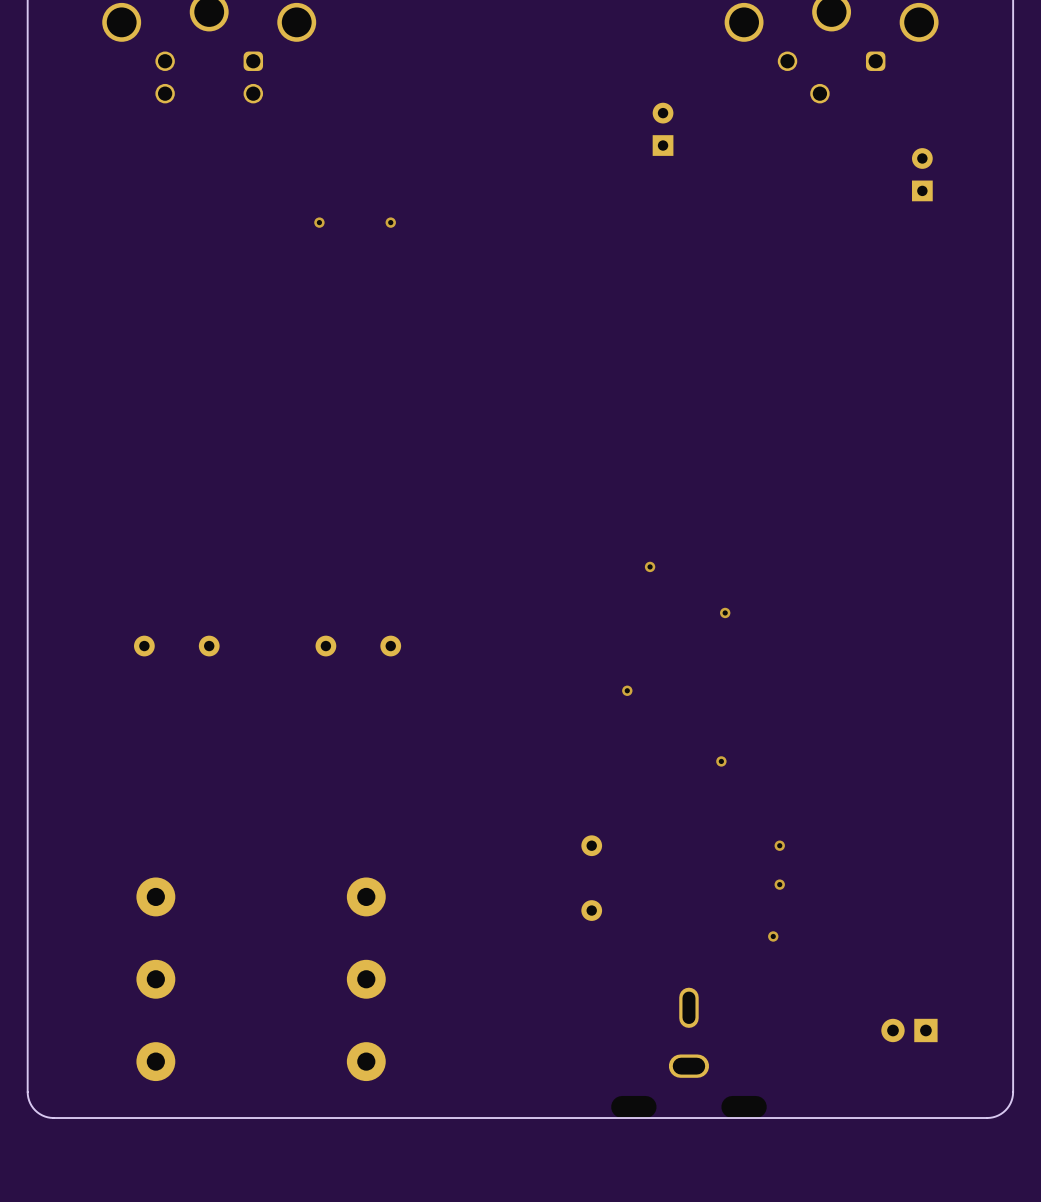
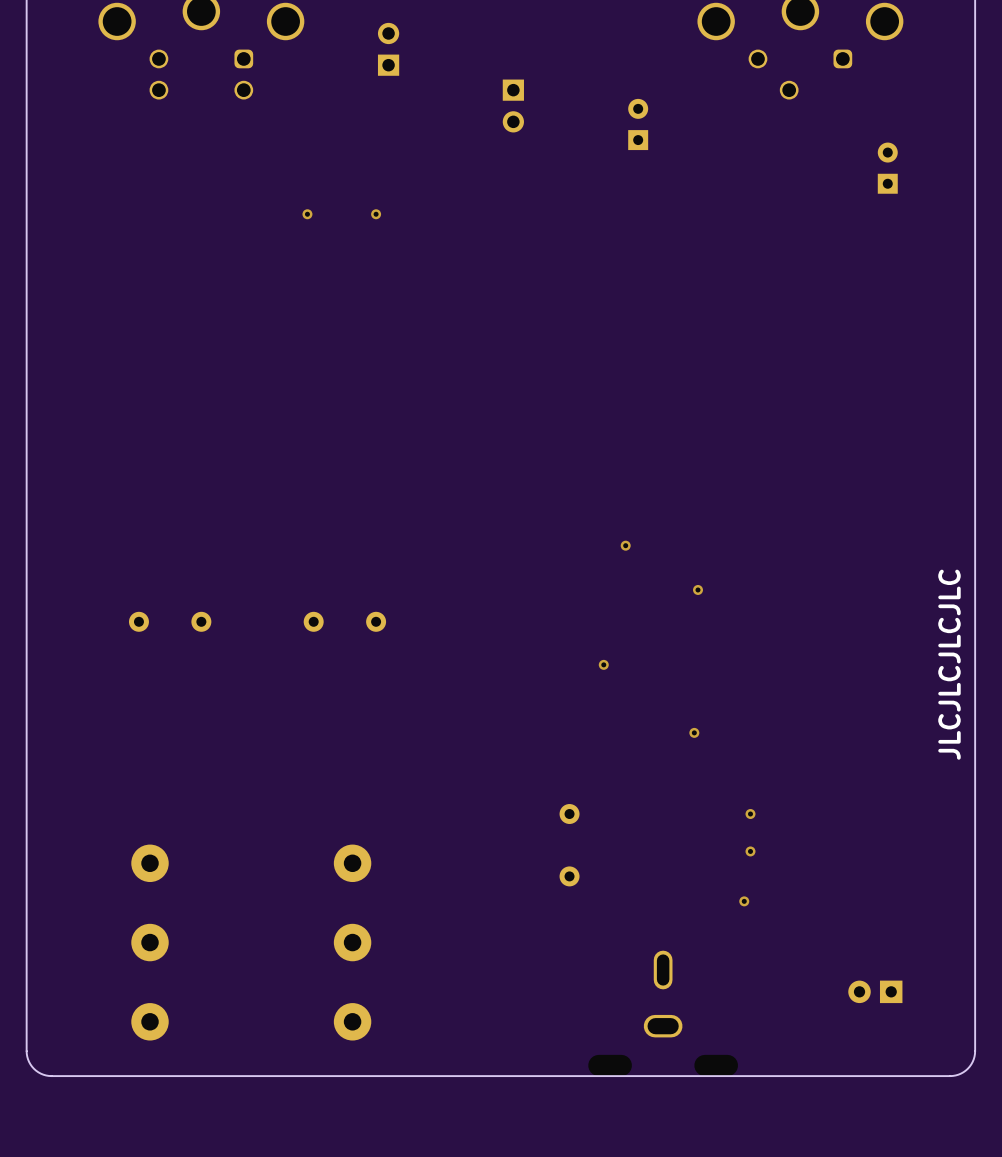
part: none -> (388, 49)
part: none -> (513, 106)
text: none -> JLCJLCJLCJLC (949, 664)

